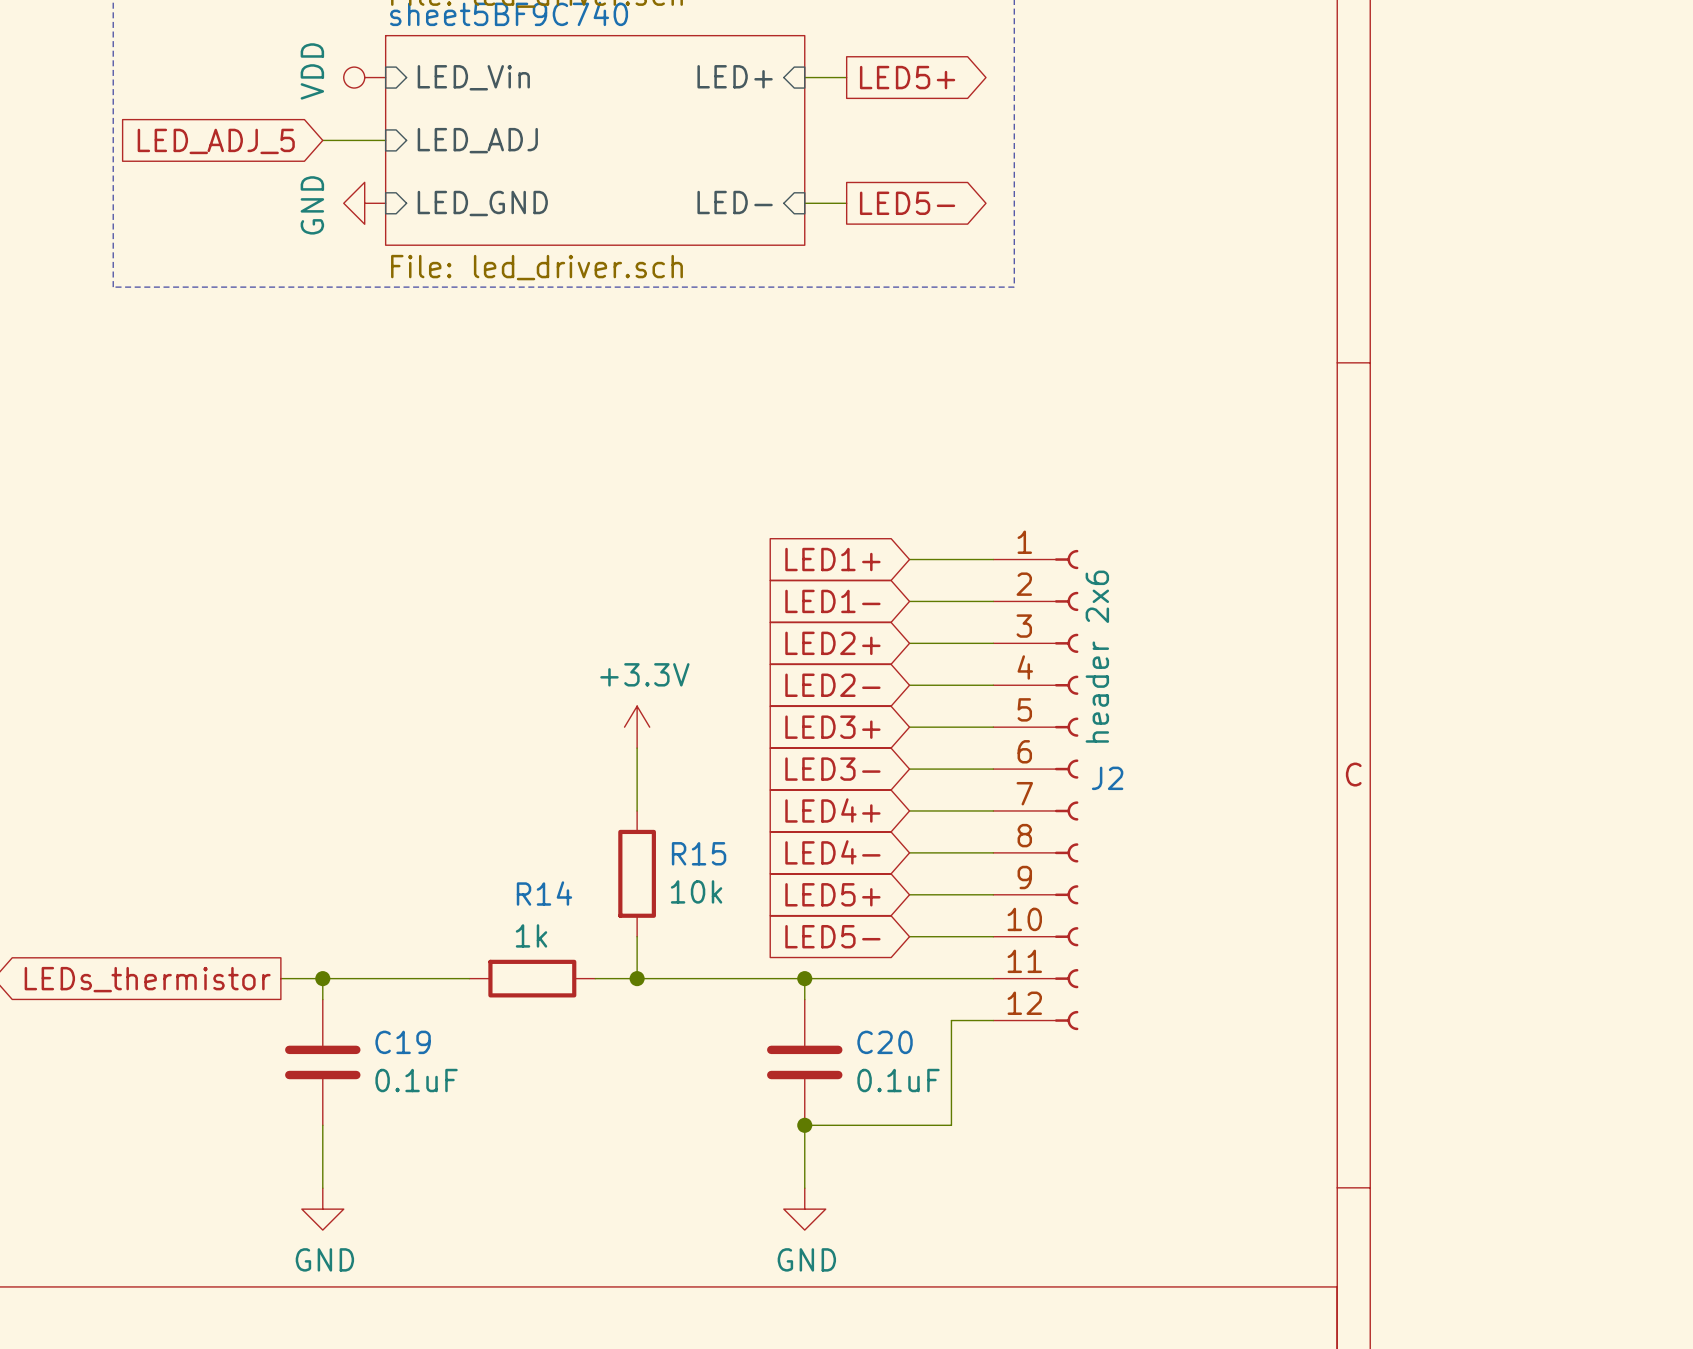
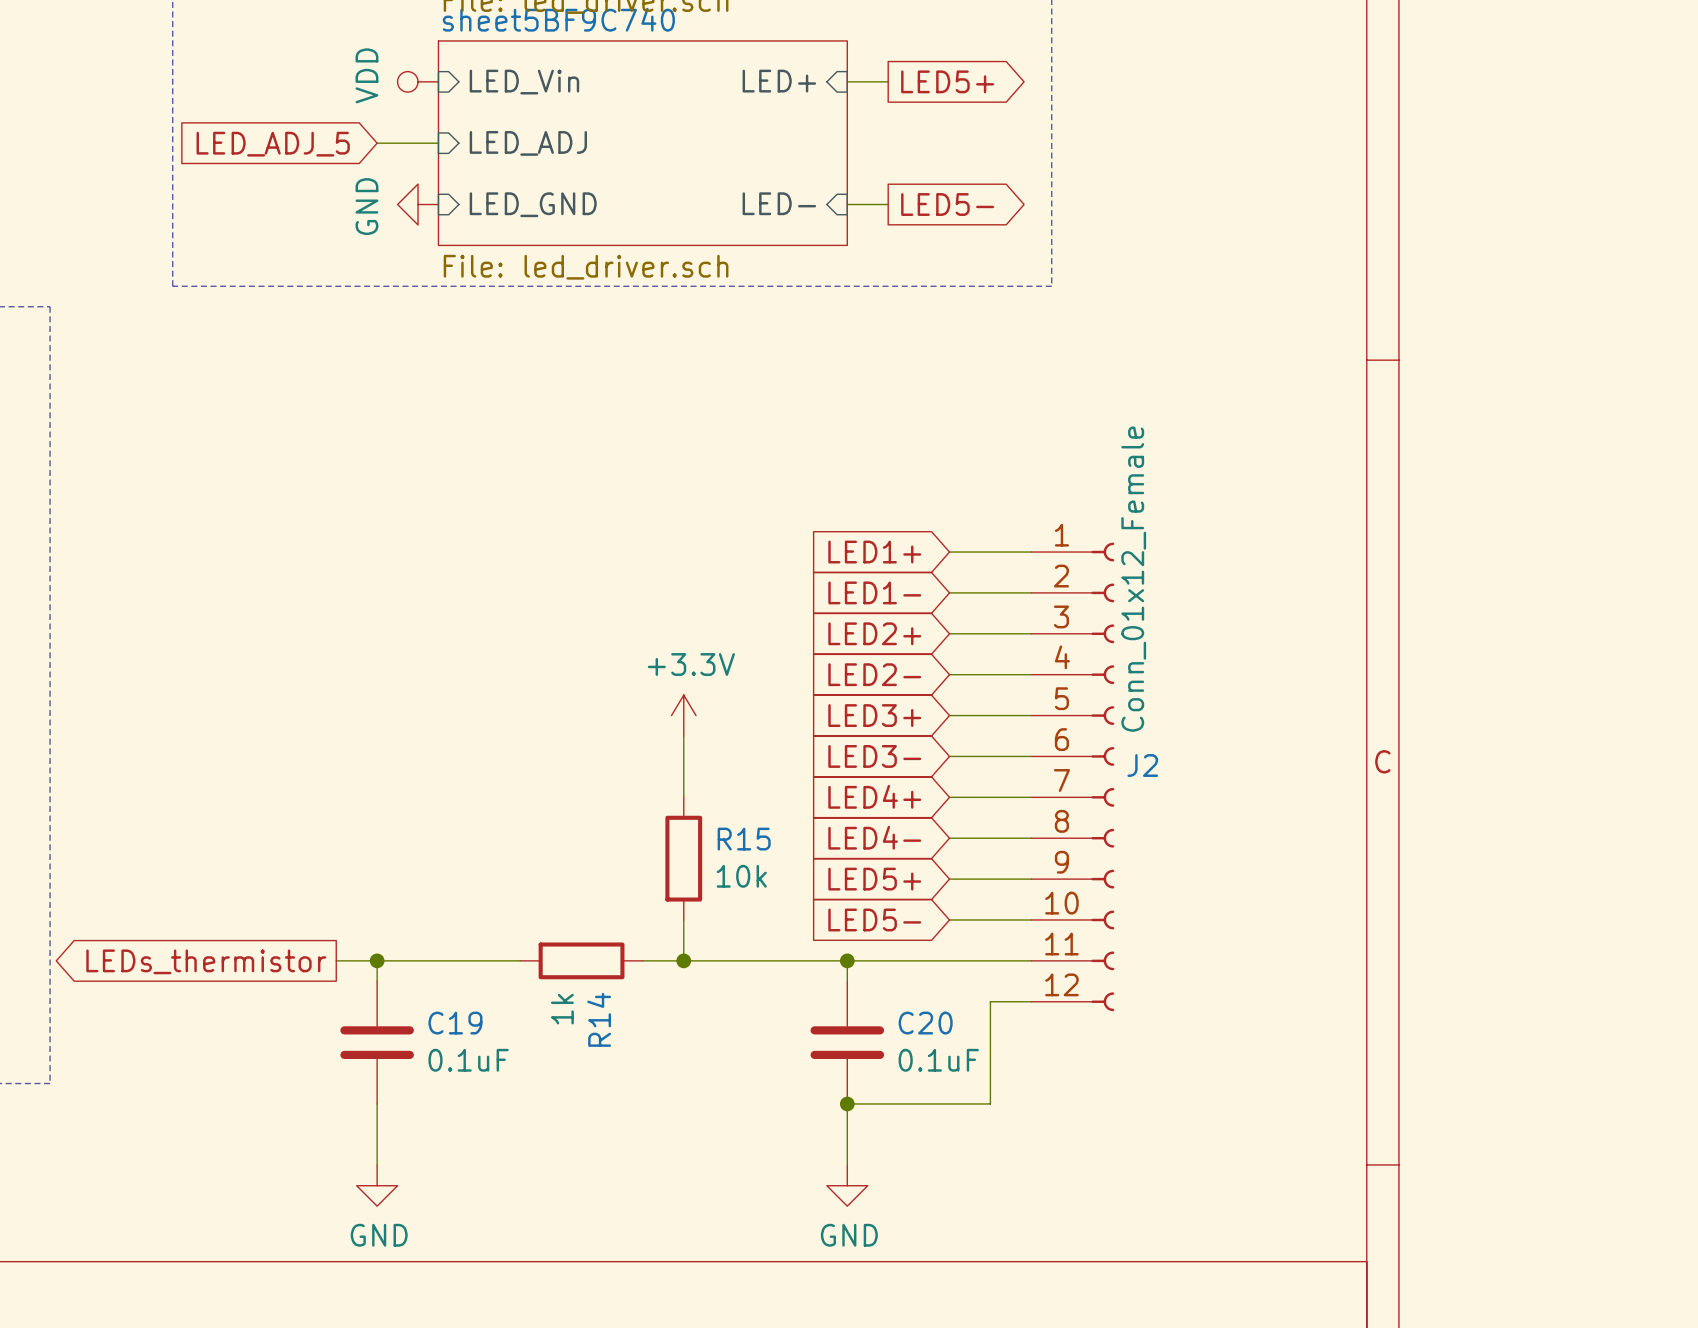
J2 value: header 2x6 (1097, 656) -> Conn_01x12_Female (1133, 579)
R14 name rotation: 0° (544, 893) -> 90° counterclockwise (599, 1019)
R14 name position: R14 (544, 893) -> R14 (599, 1019)
R14 value rotation: 0° (531, 935) -> 90° counterclockwise (562, 1009)
R14 value position: 1k (531, 935) -> 1k (562, 1009)

